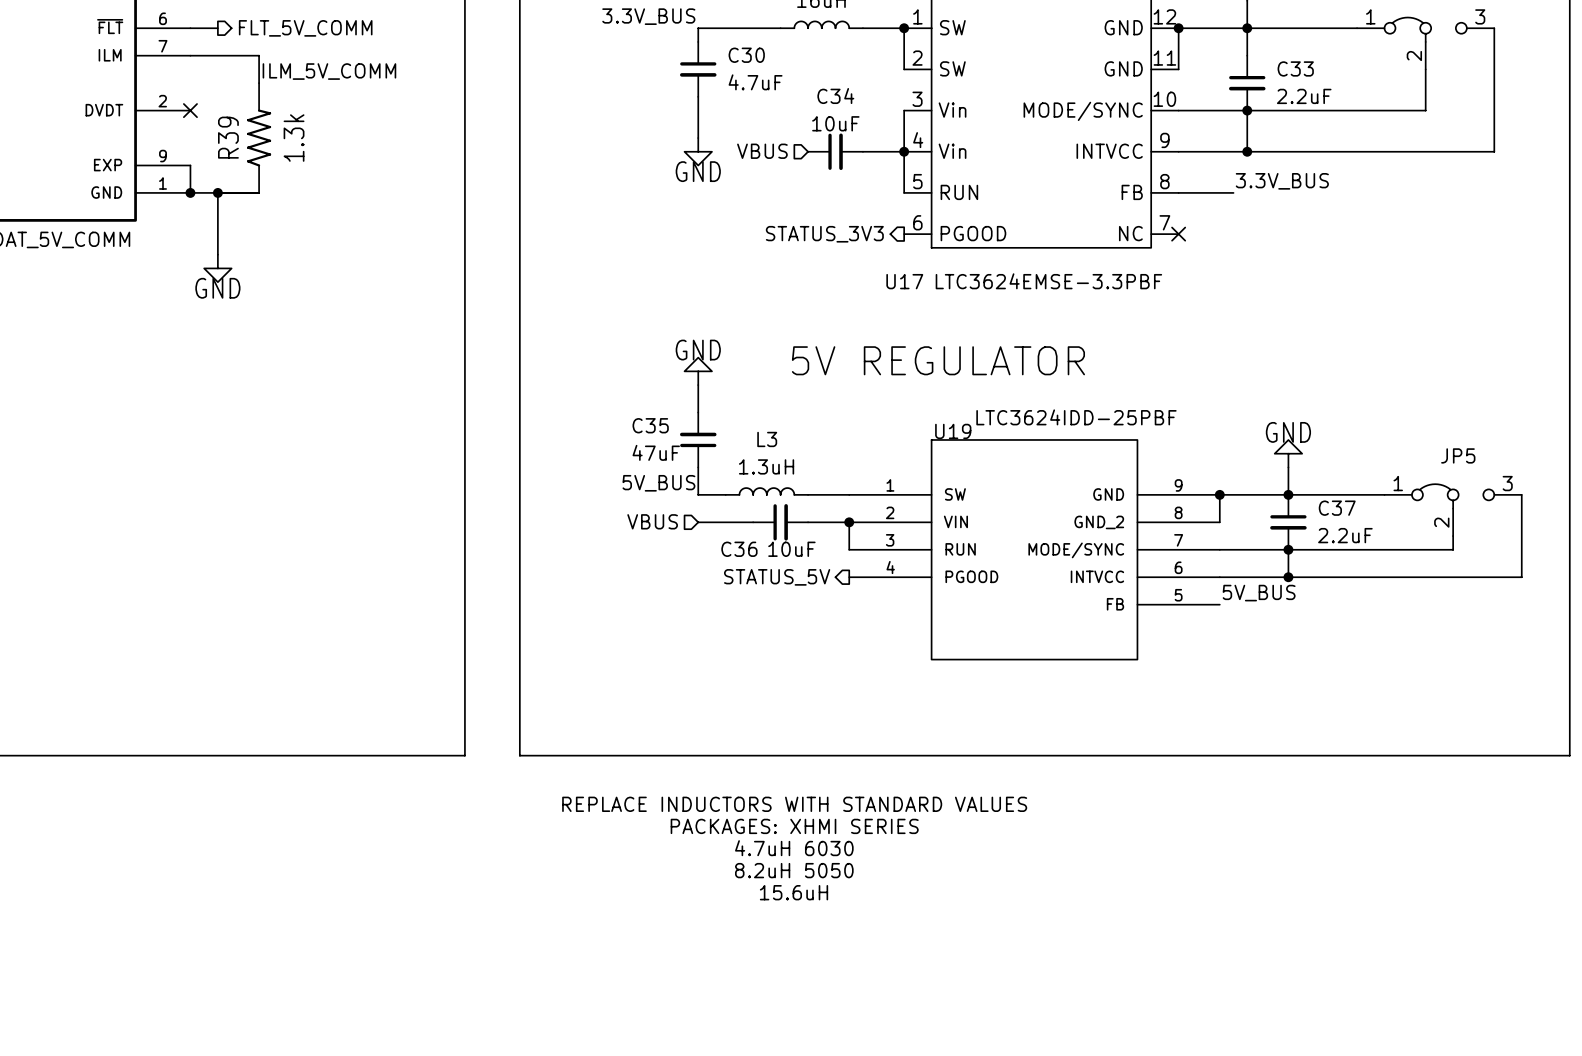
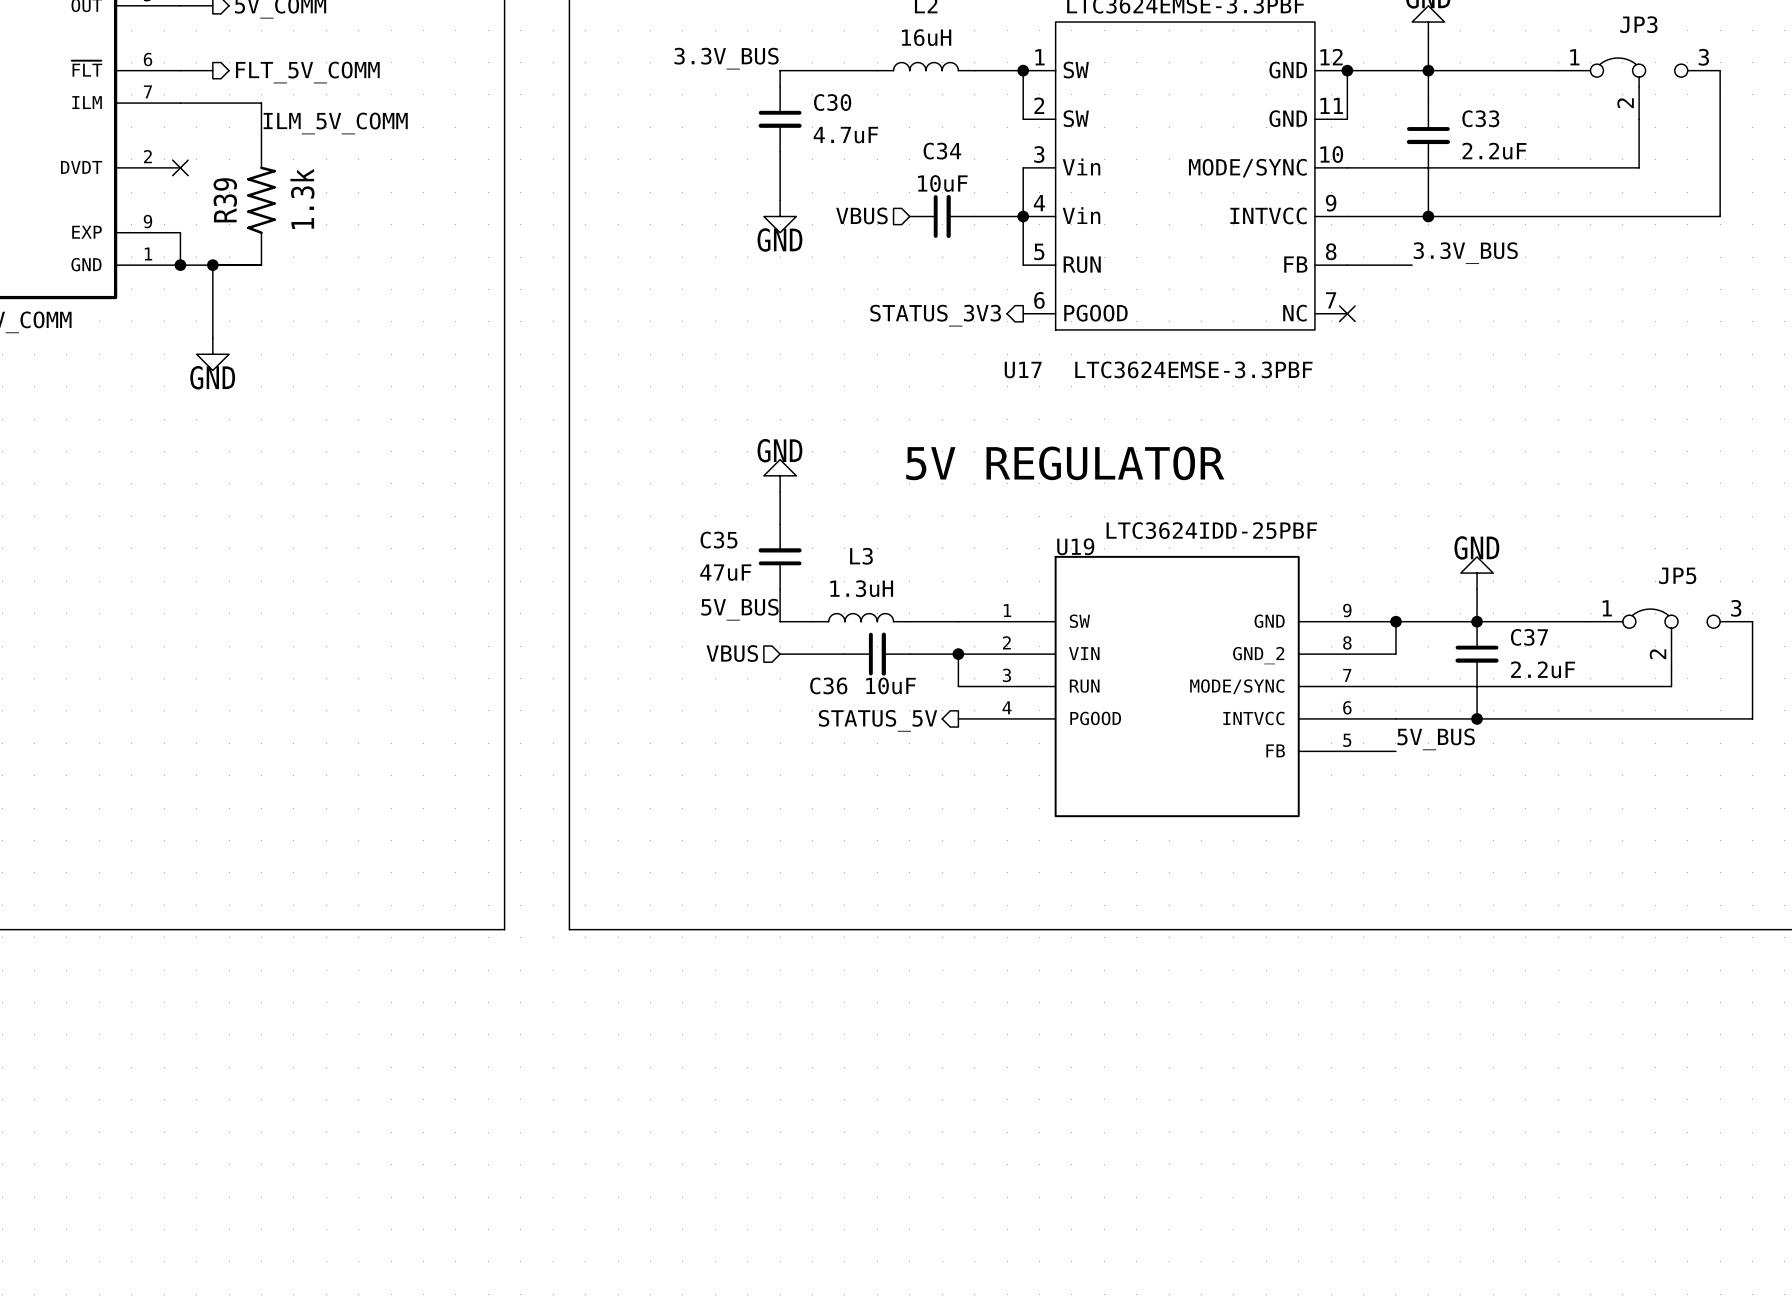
junction: (1247, 110) -> none
junction: (1288, 549) -> none
text: REPLACE INDUCTORS WITH STANDARD VALUES (794, 804) -> none
text: PACKAGES: XHMI SERIES (794, 826) -> none
text: 4.7uH 6030 (794, 848) -> none
text: 8.2uH 5050 (794, 870) -> none
text: 15.6uH (794, 892) -> none

